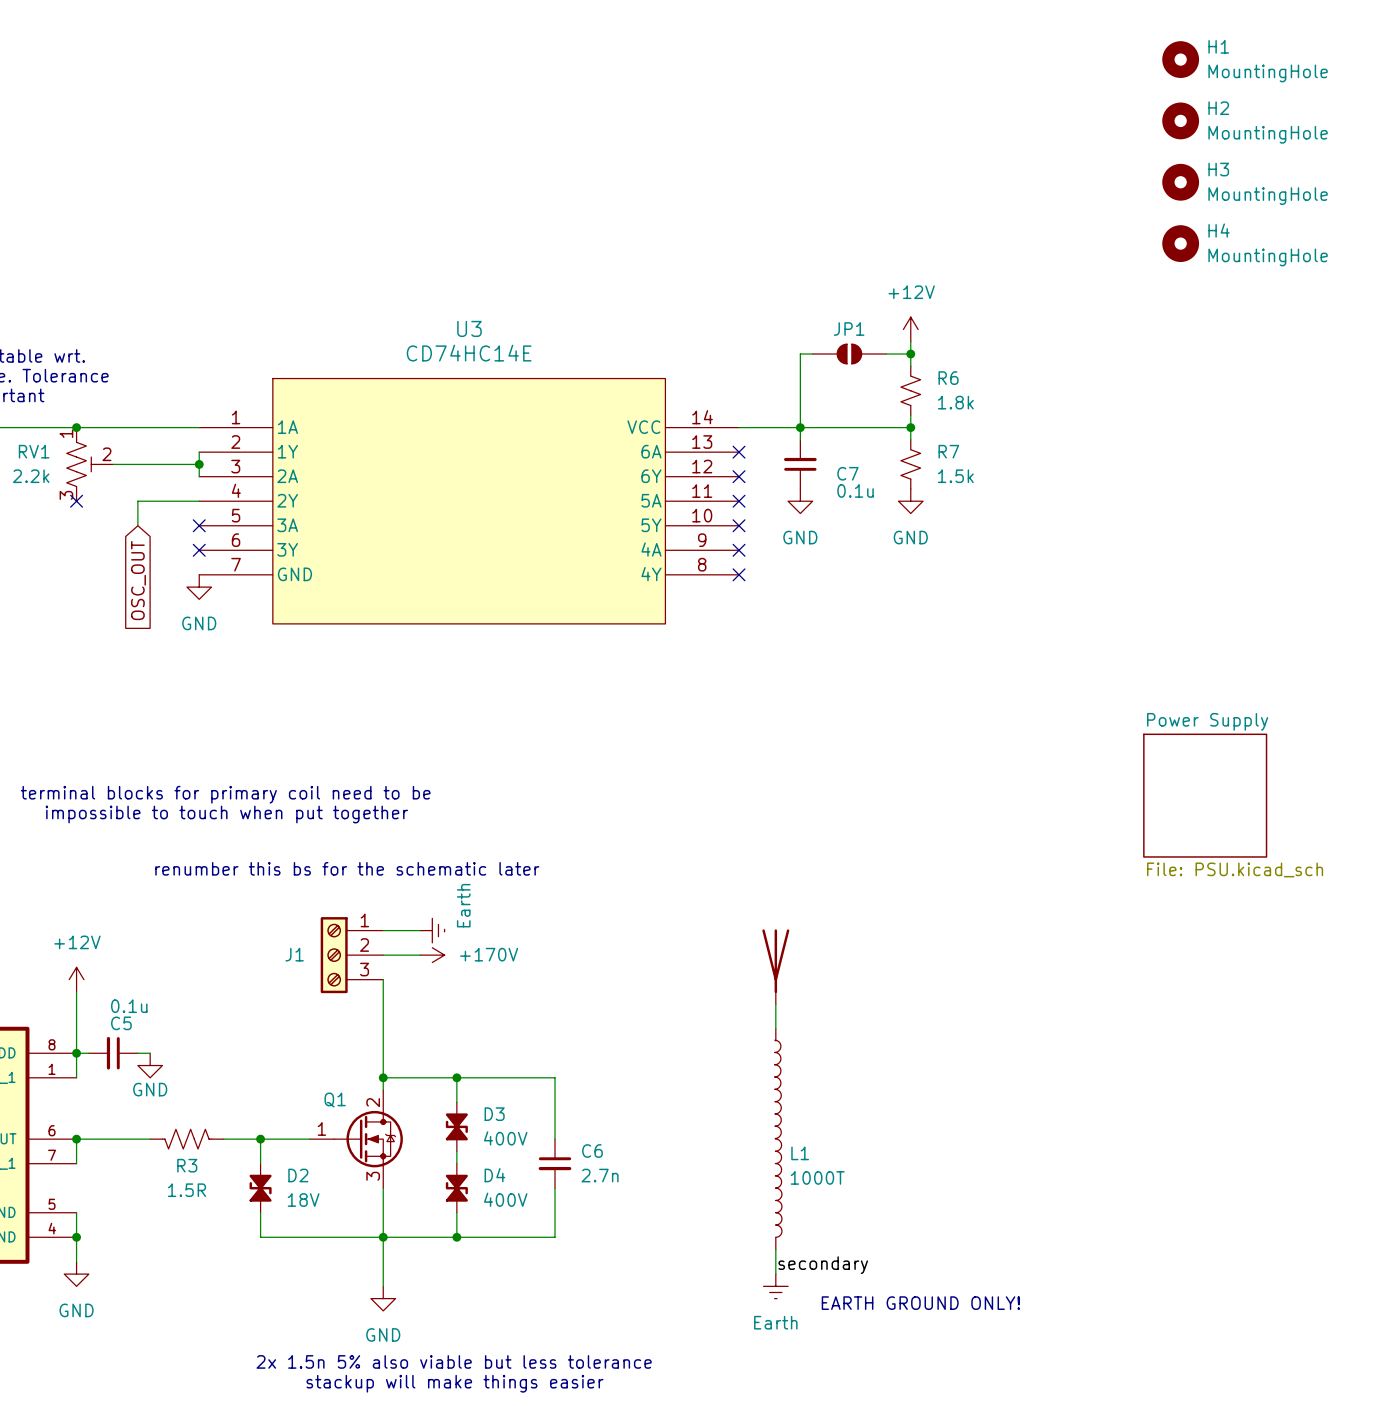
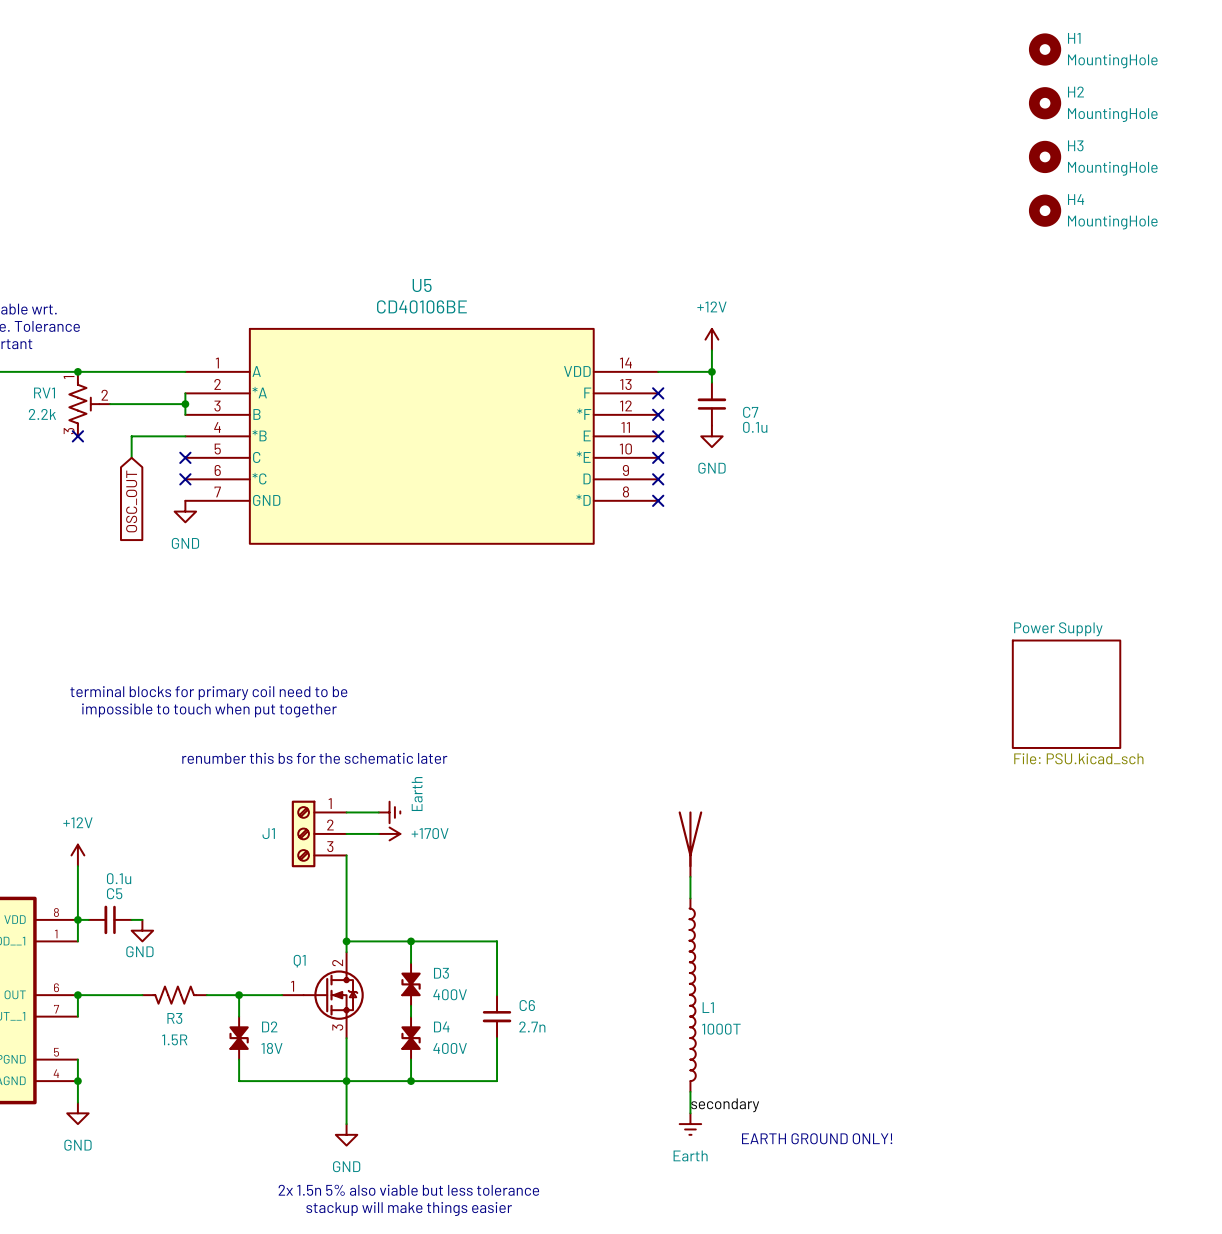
U3 name: U3 (469, 328) -> U5 (422, 285)
power symbol position: +12V (910, 329) -> +12V (711, 339)
wire: (910, 341) (910, 366) -> none
U3 value: CD74HC14E (469, 353) -> CD40106BE (421, 306)
wire: (812, 354) (800, 354) (800, 403) -> none
JP1: (849, 354) -> none
wire: (886, 354) (910, 354) -> none
junction: (910, 354) -> none
U3 symbol: [199, 378, 740, 624] -> [185, 328, 659, 544]
R6: 1.8k (910, 390) -> none
wire: (910, 415) (910, 439) -> none
wire: (800, 427) (910, 427) -> none
junction: (910, 427) -> none
R7: 1.5k (910, 464) -> none
power symbol: GND (910, 501) -> none

